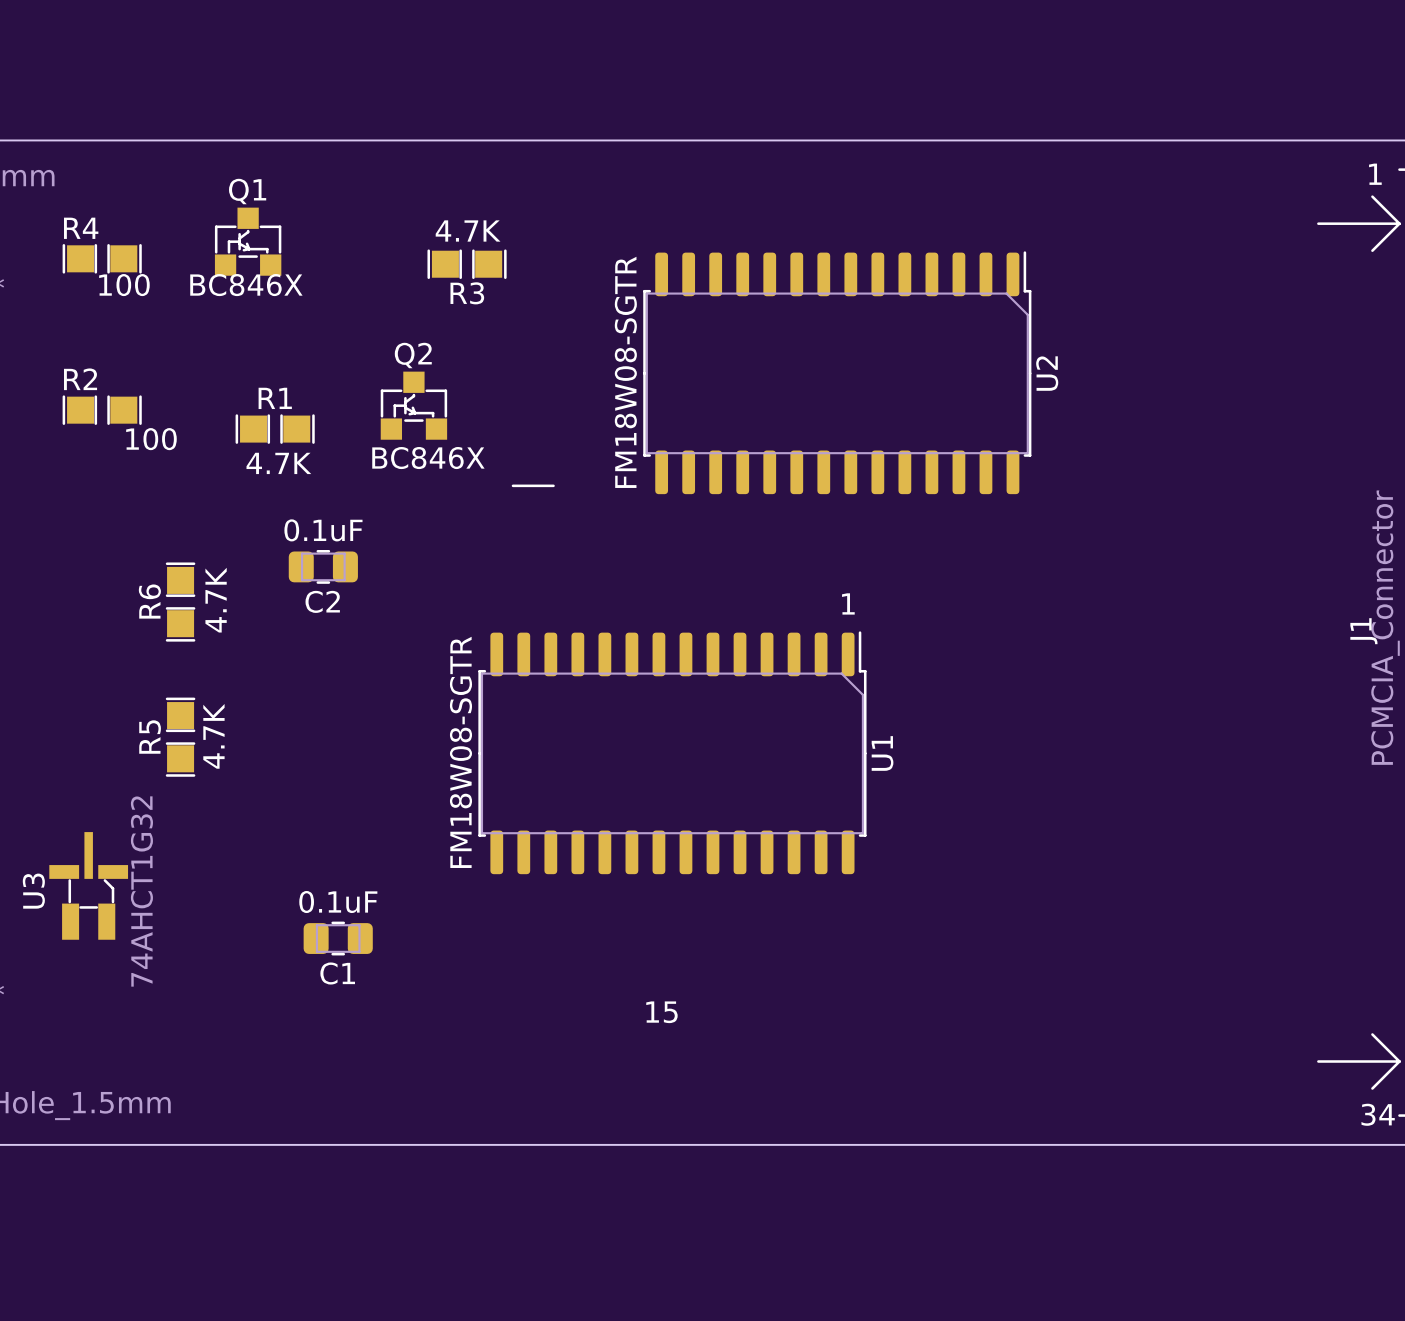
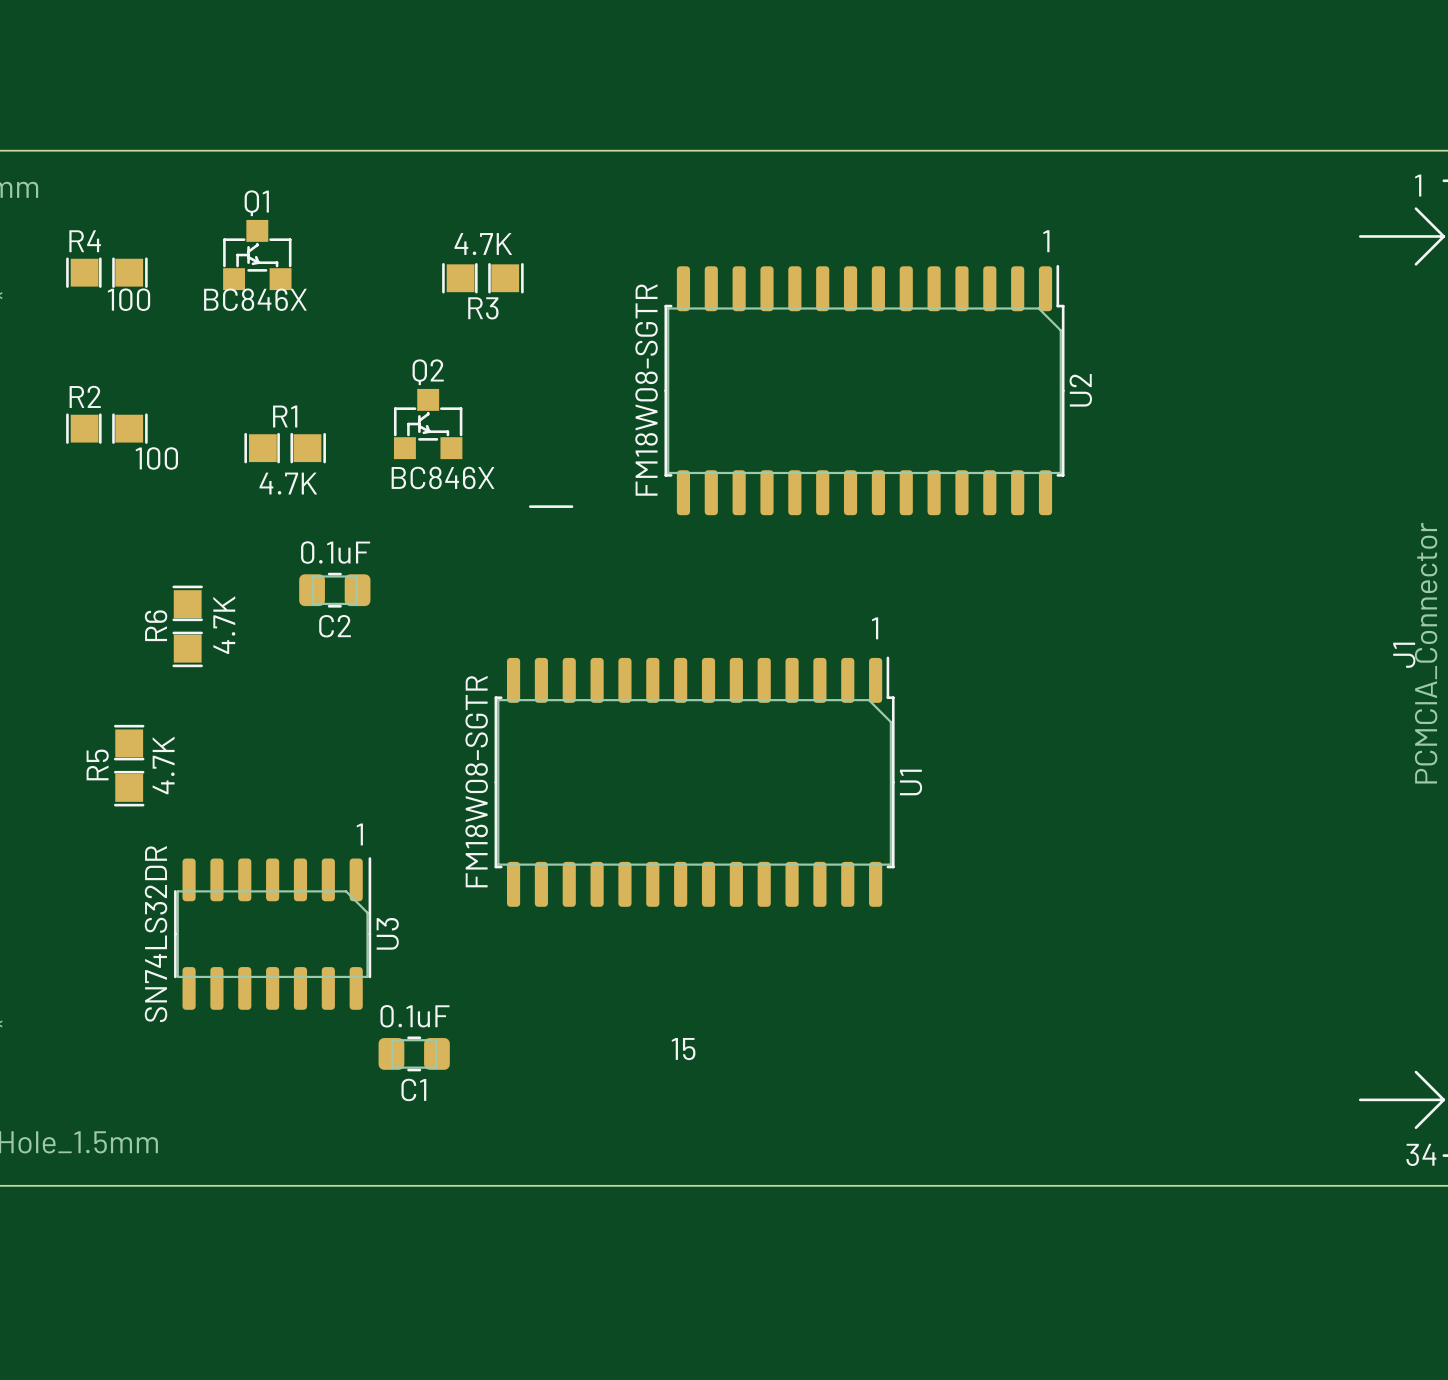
text: none -> 1 (1046, 241)
R5 position: (180, 737) -> (129, 765)
text: none -> 1 (359, 834)
U3 footprint: [49, 832, 129, 940] -> [174, 857, 372, 1010]
U3 name position: U3 (33, 891) -> U3 (387, 933)
U3 value: 74AHCT1G32 (141, 891) -> SN74LS32DR (156, 934)
C1 position: (338, 938) -> (414, 1053)

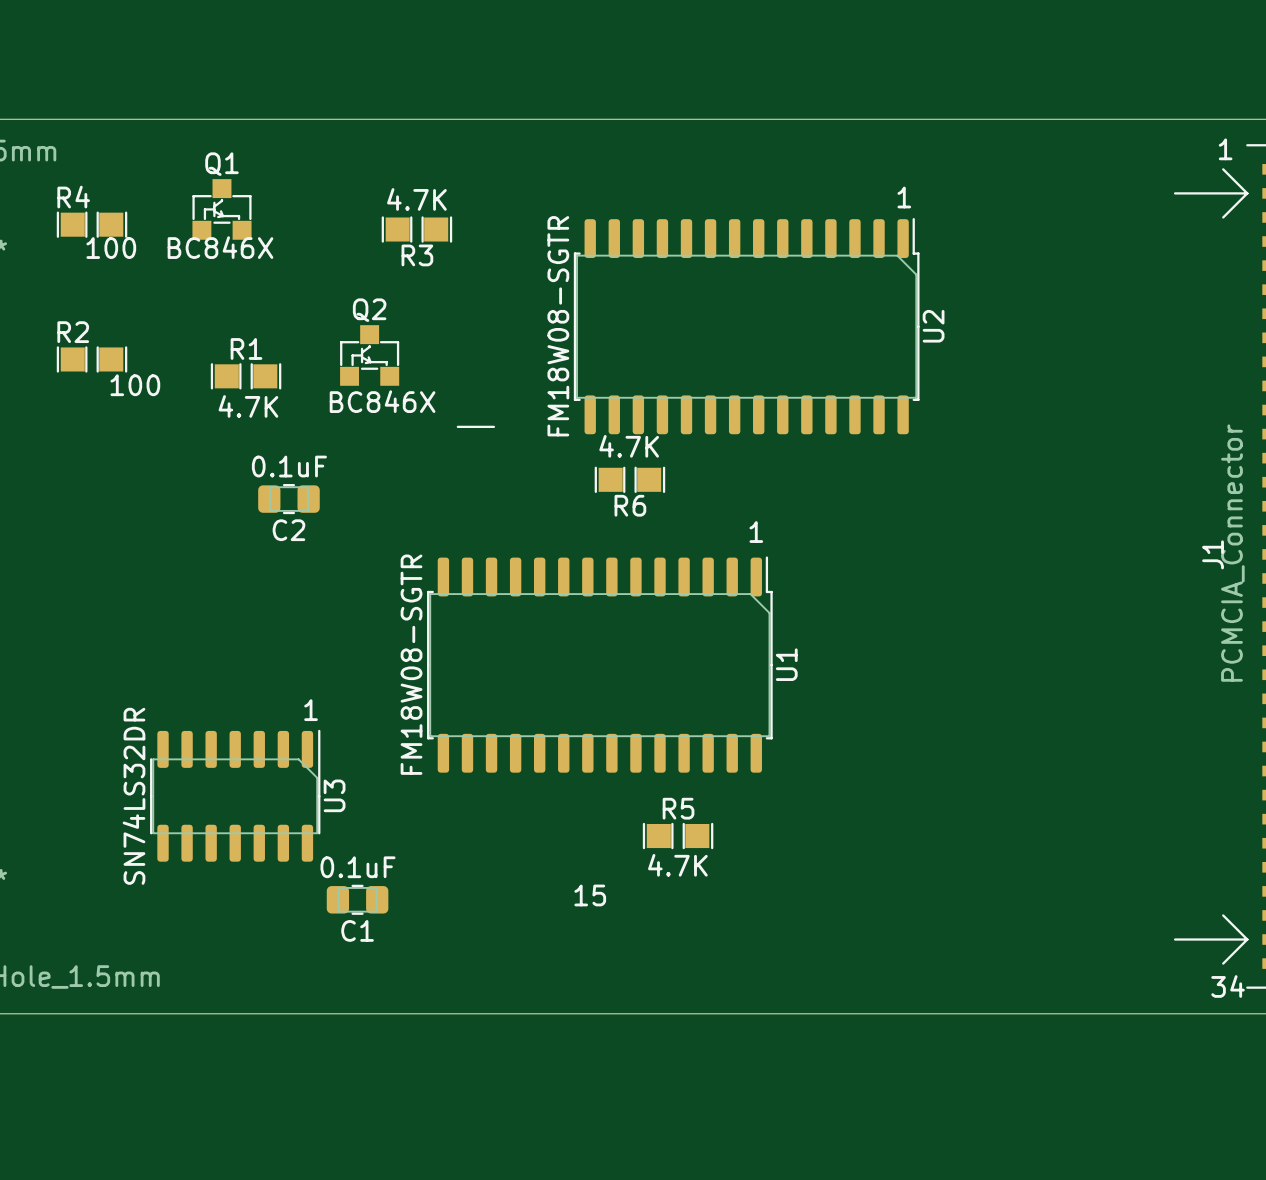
R6 value position: 4.7K (224, 625) -> 4.7K (629, 446)
R6 rotation: 0° (187, 626) -> 90° clockwise (629, 479)
R6 position: (187, 626) -> (629, 479)
R5 rotation: 0° (129, 765) -> 90° clockwise (678, 836)
R5 position: (129, 765) -> (678, 836)

